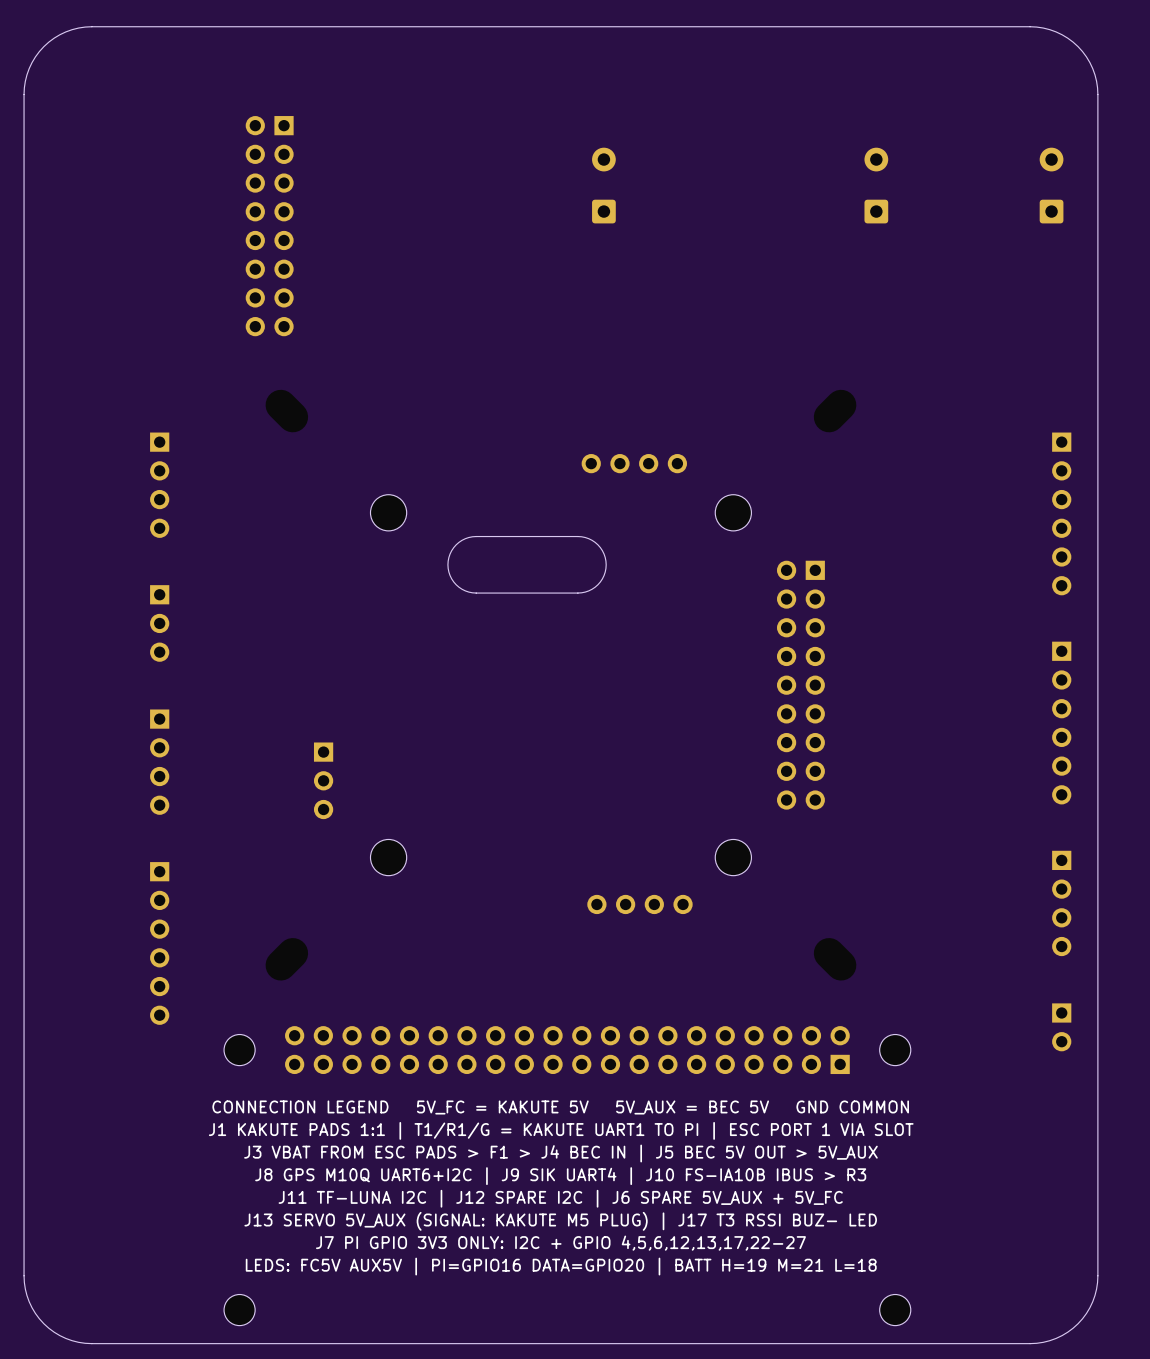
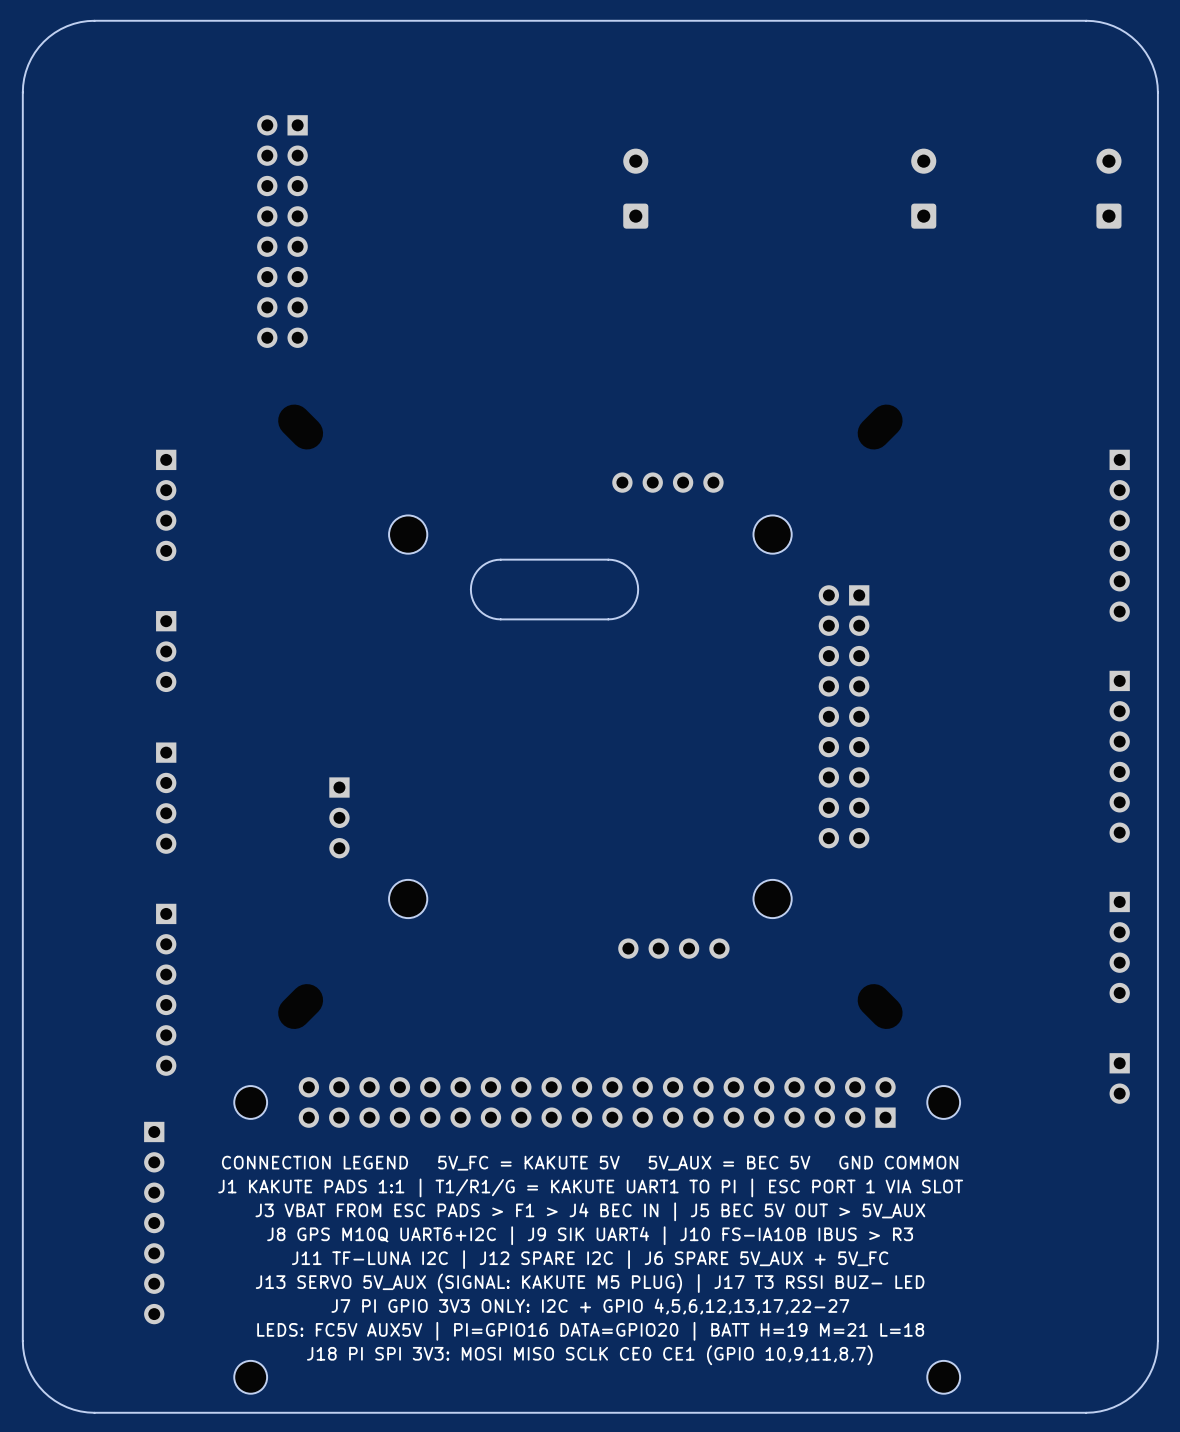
part: none -> (154, 1223)
text: none -> J18 PI SPI 3V3: MOSI MISO SCLK CE0 CE1 (GPIO 10,9,11,8,7) (589, 1355)

